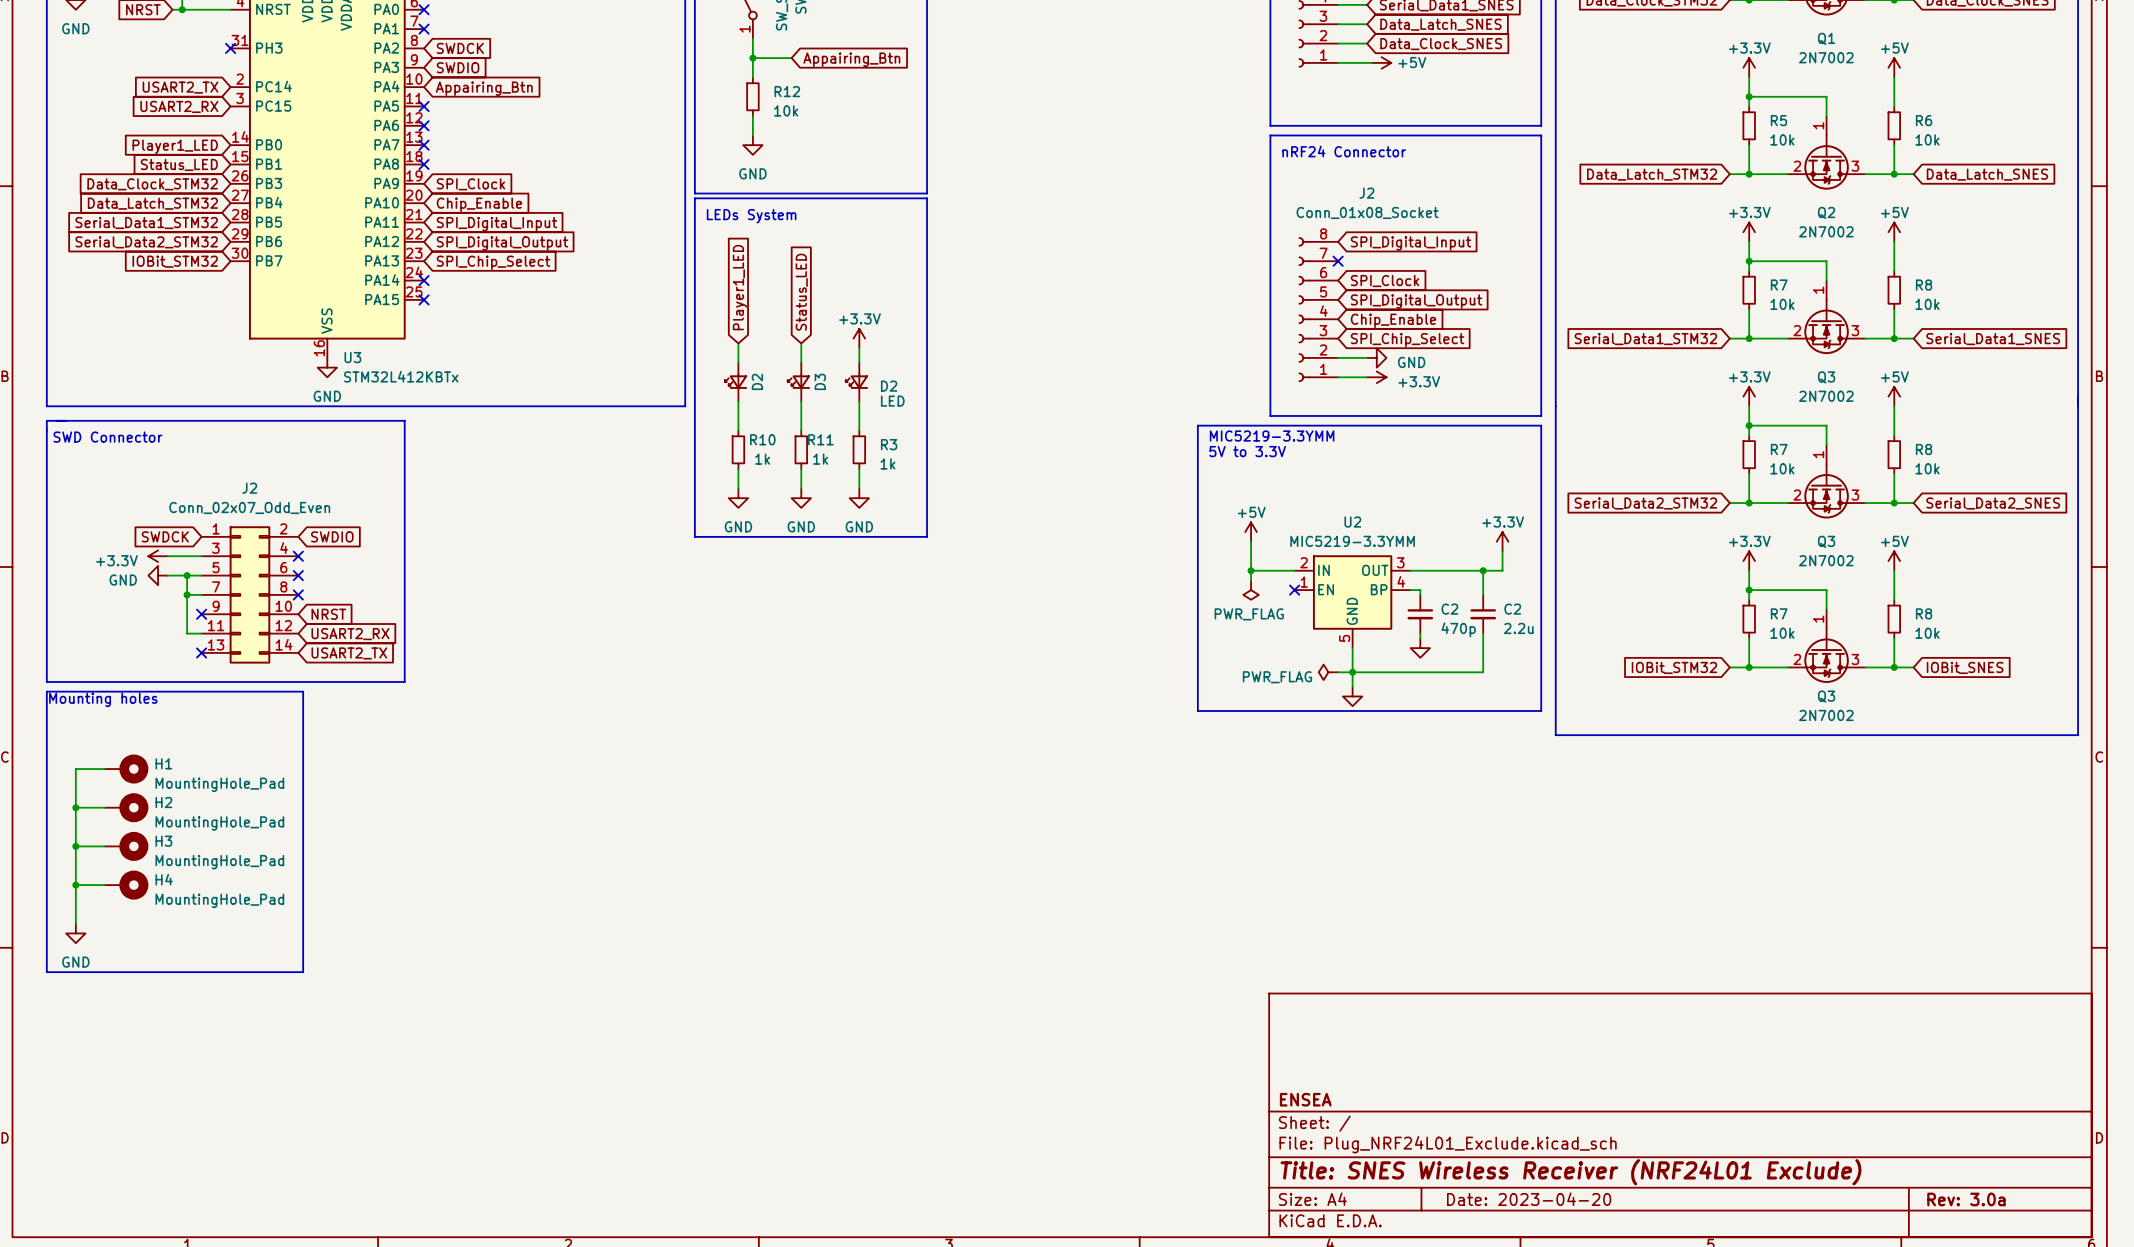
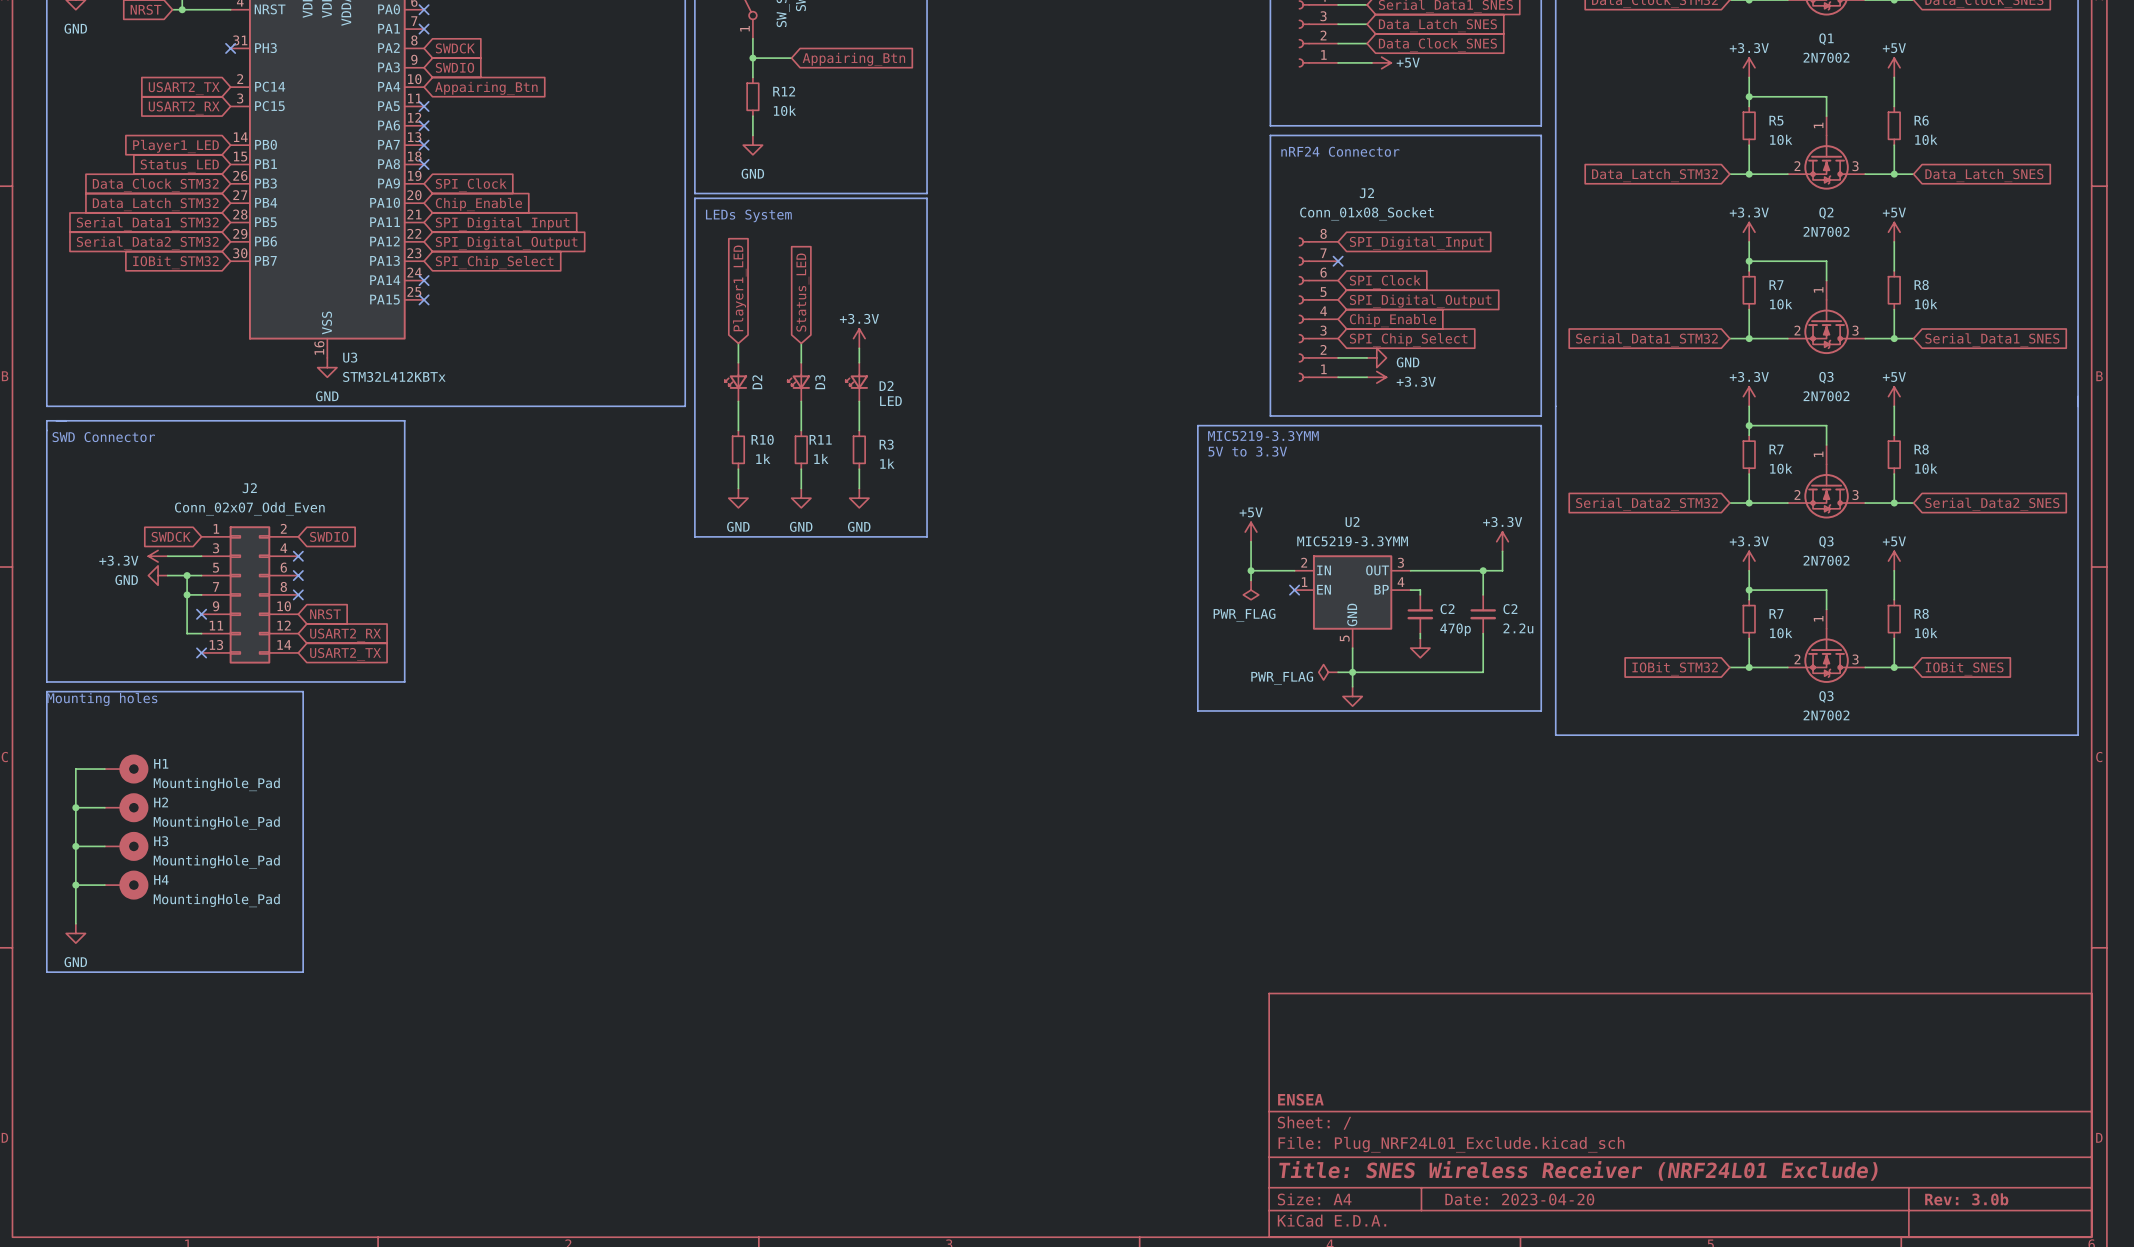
title block: Rev: 3.0a (1966, 1199) -> Rev: 3.0b (1966, 1199)

